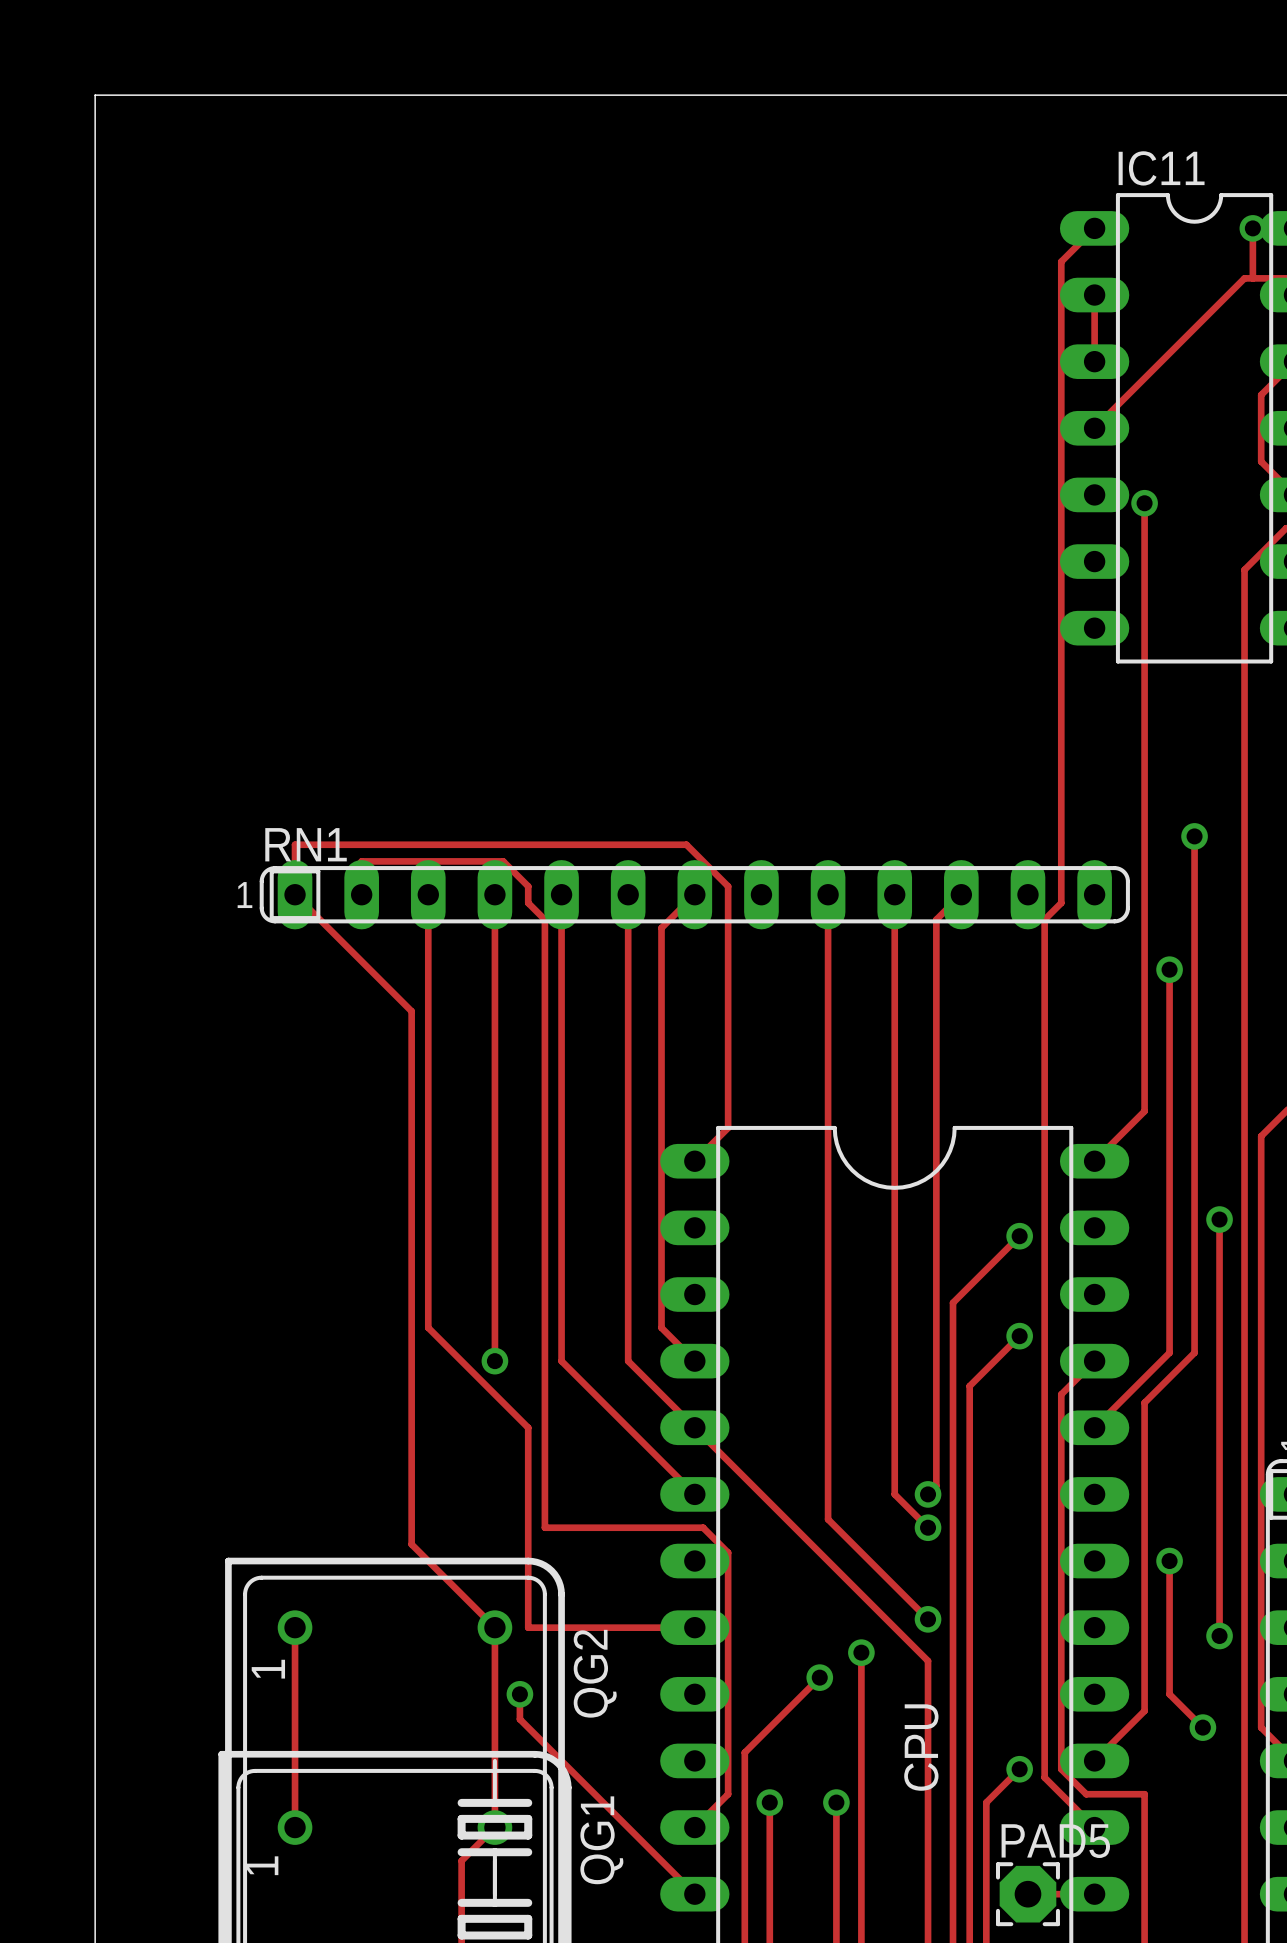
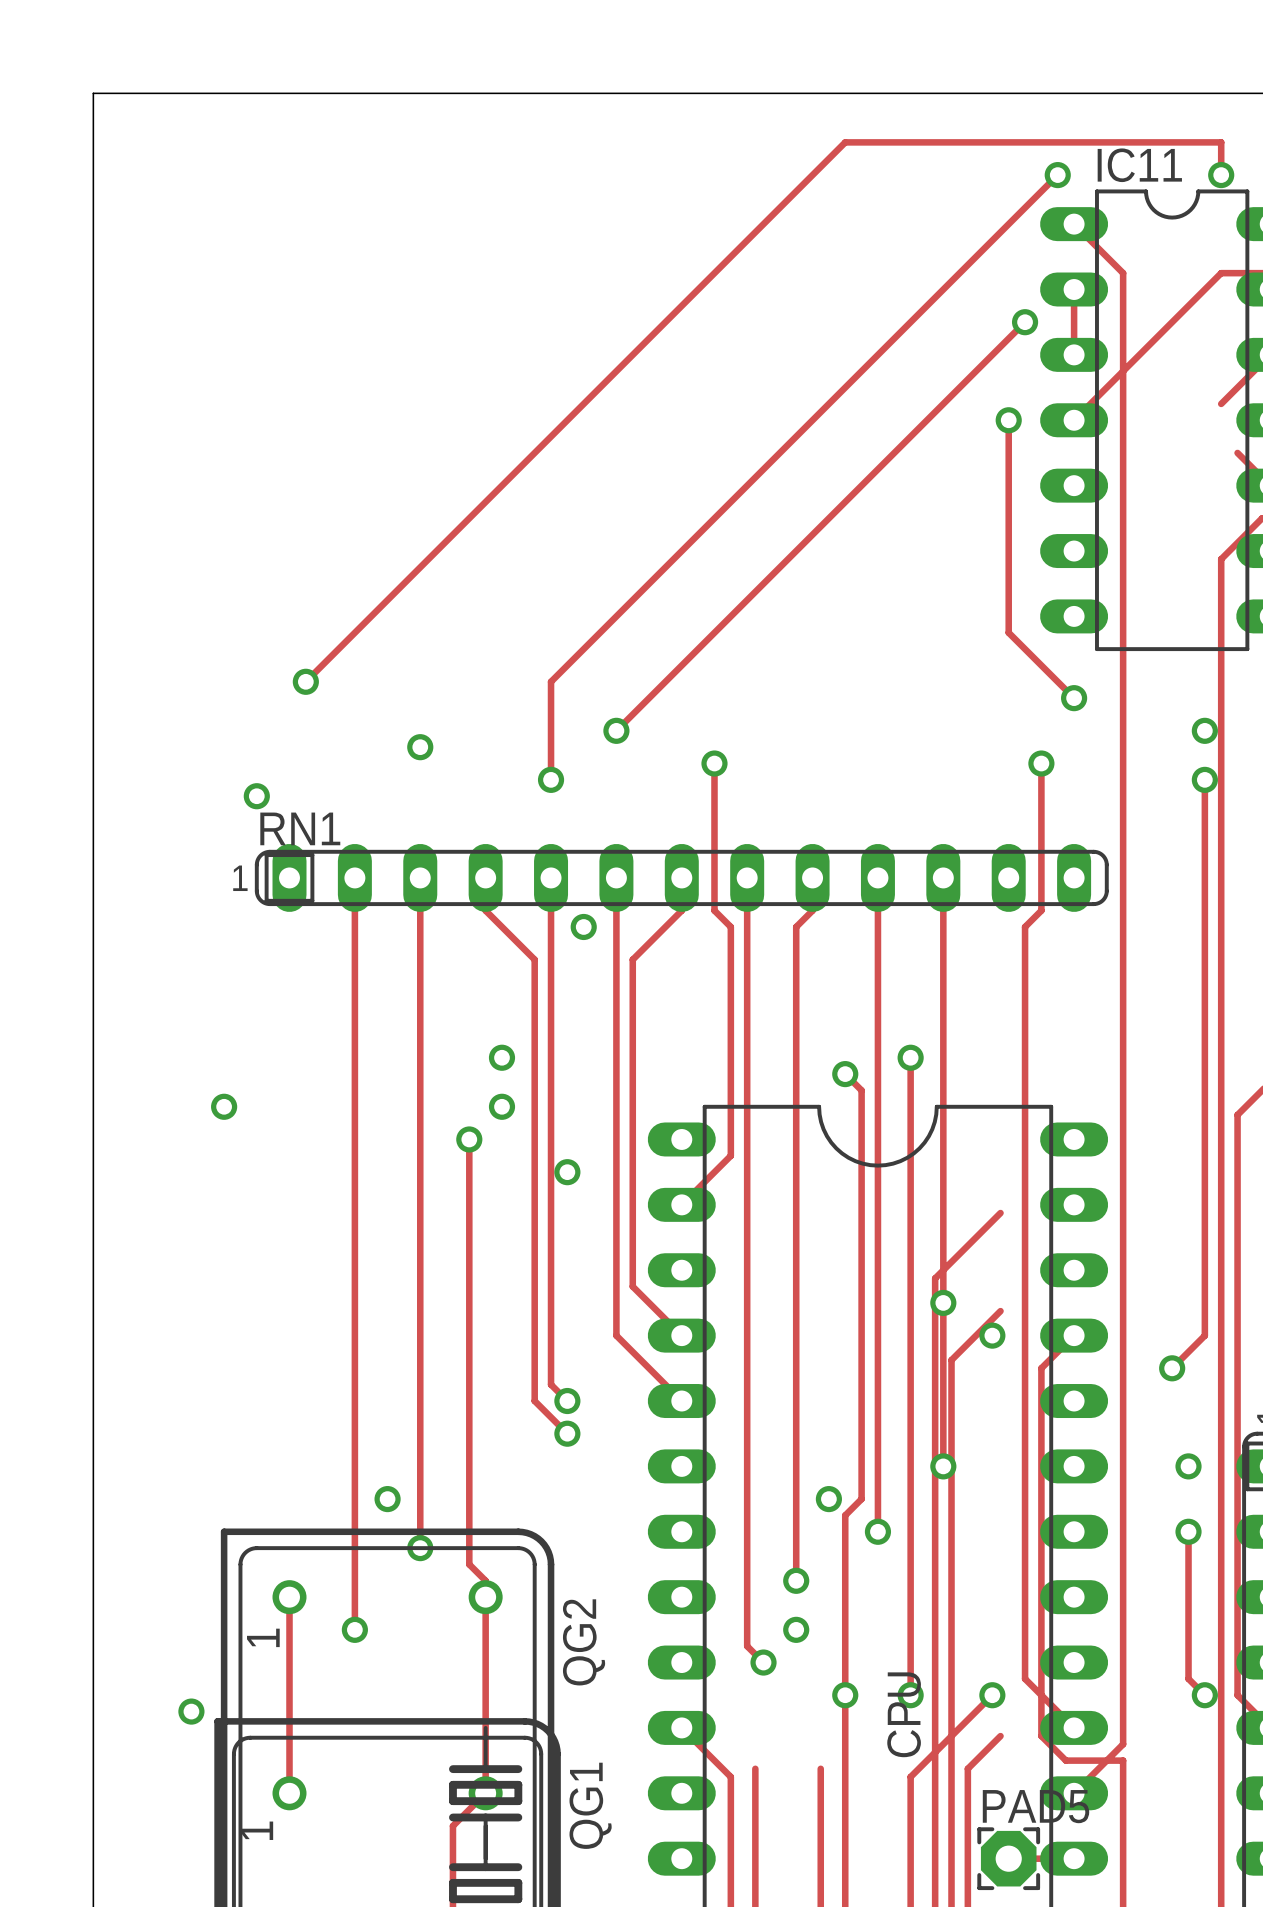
track: none -> (1057, 175) (551, 681) (551, 779)
via: none -> (1057, 175)
track: none -> (1221, 175) (1221, 142) (845, 142) (305, 681)
track: (1094, 228) (1061, 261) (1061, 778) -> (1074, 224) (1123, 273) (1123, 493)
track: (1252, 228) (1252, 278) -> none
via position: (1252, 228) -> (1221, 175)
track: none -> (1025, 322) (616, 730)
via: none -> (1025, 322)
track: (1261, 394) (1261, 461) -> (1237, 387) (1221, 403)
track: none -> (1008, 420) (1008, 632) (1074, 698)
via: none -> (1008, 420)
via: (1144, 503) -> none
via: none -> (305, 681)
via: none -> (1074, 698)
via: none -> (616, 730)
via: none -> (1204, 730)
via: none -> (420, 747)
track: none -> (714, 763) (714, 869)
via: none -> (714, 763)
via: none -> (1041, 763)
via: none -> (551, 779)
track: none -> (1204, 779) (1204, 1335) (1172, 1368)
via: none -> (1204, 779)
via: none -> (256, 796)
track: (1194, 836) (1194, 1352) (1144, 1402) -> none
via: (1194, 836) -> none
track: (728, 886) (686, 844) (295, 844) (295, 894) (411, 1011) (411, 1544) (494, 1627) -> (469, 1139) (469, 1564) (485, 1580) (485, 1597)
track: (361, 894) (361, 861) (503, 861) (528, 886) (528, 903) (544, 919) (544, 978) -> (485, 910) (534, 959)
track: none -> (354, 877) (354, 1629)
track: (694, 894) (661, 928) (661, 1327) -> (681, 877) (681, 910) (632, 959) (632, 1286) (649, 1302)
track: none -> (747, 877) (747, 1646) (763, 1662)
track: (961, 894) (936, 919) (936, 1486) (928, 1494) -> (943, 877) (943, 1466)
track: (1061, 903) (1044, 919) (1044, 944) -> (1041, 886) (1041, 910) (1025, 926)
track: (494, 928) (494, 1361) -> none
track: (728, 928) (728, 1127) (694, 1161) -> (714, 910) (730, 926) (730, 1155) (681, 1204)
track: (828, 928) (828, 1519) (928, 1619) -> (812, 910) (796, 926) (796, 1580)
via: none -> (583, 926)
track: (1169, 969) (1169, 1352) (1094, 1427) -> none
via: (1169, 969) -> none
via: none -> (501, 1057)
via: none -> (910, 1057)
track: none -> (845, 1074) (861, 1090) (861, 1499) (845, 1515) (845, 1621)
via: none -> (845, 1074)
track: (1144, 1111) (1094, 1161) -> (1123, 1090) (1123, 1376)
via: none -> (224, 1106)
via: none -> (501, 1106)
via: none -> (469, 1139)
via: none -> (567, 1172)
track: (1219, 1219) (1219, 1635) -> none
via: (1219, 1219) -> none
via: (1019, 1236) -> none
track: (428, 1327) (528, 1427) (528, 1627) (694, 1627) -> (420, 1302) (420, 1548)
via: none -> (943, 1302)
via position: (1019, 1336) -> (992, 1335)
via: (494, 1361) -> none
track: (561, 1361) (694, 1494) -> (551, 1335) (551, 1384) (567, 1401)
via: none -> (1172, 1368)
track: (544, 1427) (544, 1527) (703, 1527) (728, 1552) (728, 1794) (694, 1827) -> (534, 1401) (567, 1433)
via: none -> (567, 1401)
track: (694, 1427) (928, 1660) -> (910, 1057) (910, 1629)
via: none -> (567, 1433)
track: (894, 1494) (928, 1527) -> (877, 1466) (877, 1531)
via: (928, 1494) -> none
via: none -> (943, 1466)
via: none -> (1188, 1466)
via: none -> (387, 1499)
via: none -> (828, 1499)
via: (928, 1527) -> none
via: none -> (877, 1531)
track: (1169, 1561) (1169, 1694) (1202, 1727) -> none
via: (1169, 1561) -> none
track: none -> (1188, 1531) (1188, 1678) (1204, 1695)
via: none -> (1188, 1531)
via: none -> (420, 1548)
via: none -> (796, 1580)
via: (928, 1619) -> none
via: (1219, 1635) -> none
via: (861, 1652) -> none
via: none -> (354, 1629)
track: (819, 1677) (744, 1752) (744, 1810) -> (681, 1727) (730, 1776)
via position: (819, 1677) -> (796, 1629)
track: (519, 1694) (519, 1719) (694, 1894) -> none
via: (519, 1694) -> none
via: none -> (763, 1662)
track: (1044, 1710) (1044, 1777) (1094, 1827) -> (1025, 1678) (1074, 1727)
track: (1144, 1710) (1094, 1760) -> (1123, 1678) (1123, 1744) (1074, 1793)
via: none -> (845, 1695)
track: (928, 1727) (928, 1810) -> (992, 1695) (910, 1776)
via: none -> (910, 1695)
via position: (1202, 1727) -> (1204, 1695)
via: none -> (191, 1711)
via position: (1019, 1769) -> (992, 1695)
via: (769, 1802) -> none
via: (836, 1802) -> none

